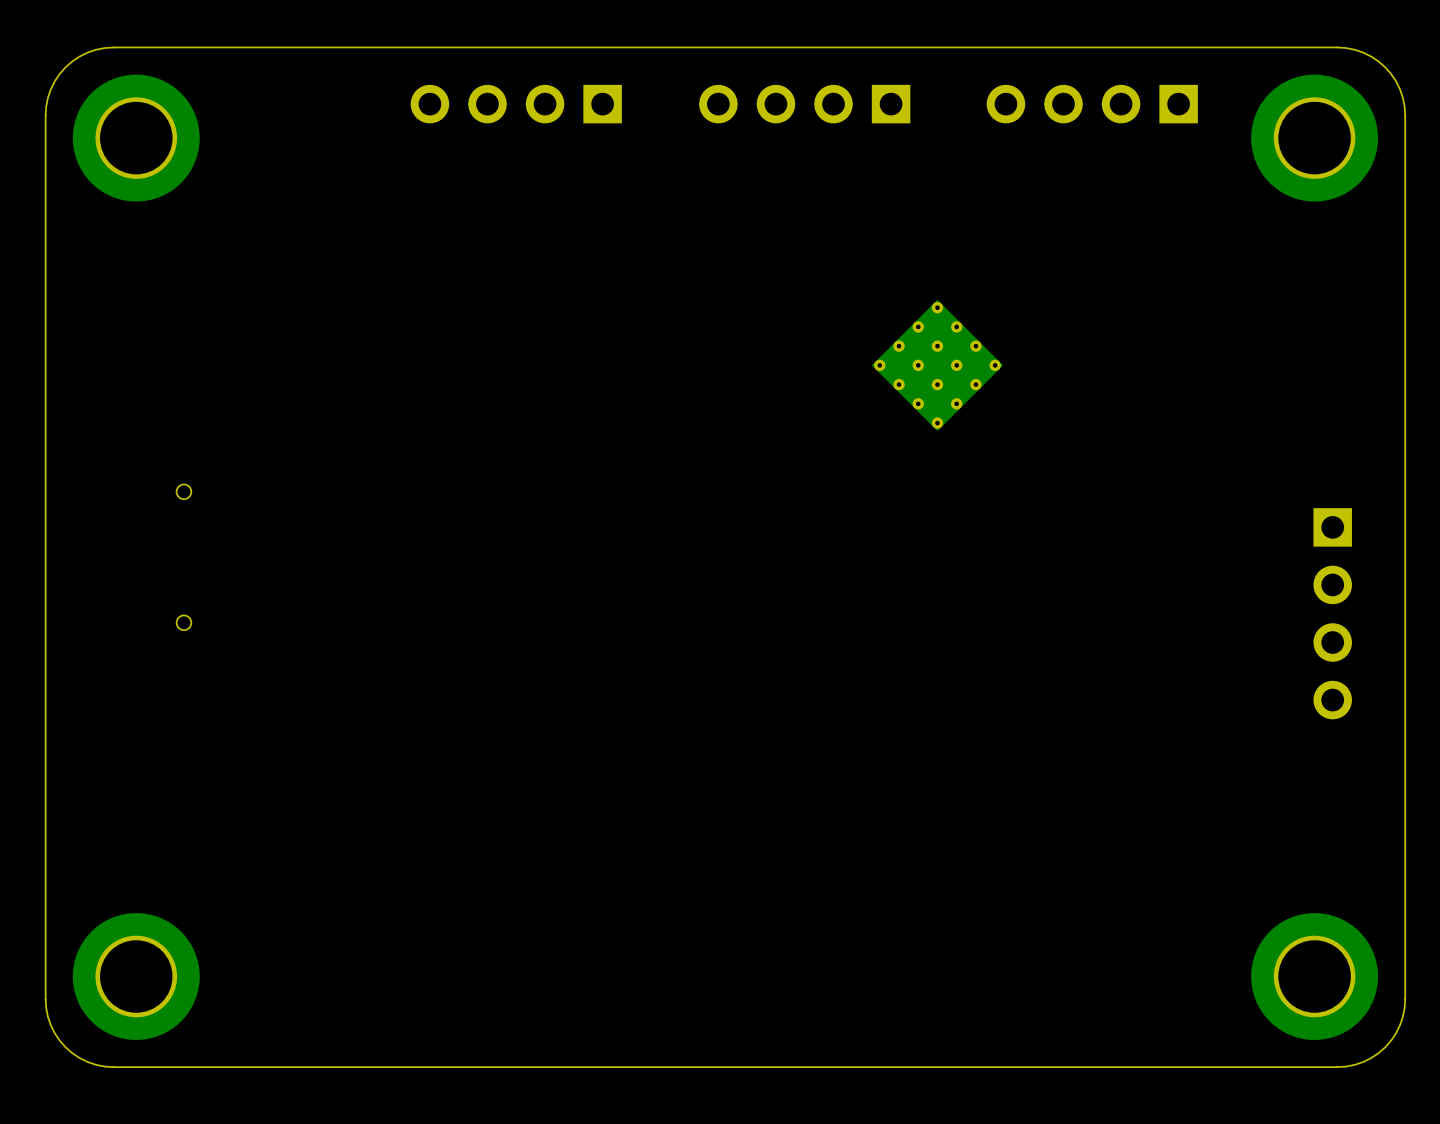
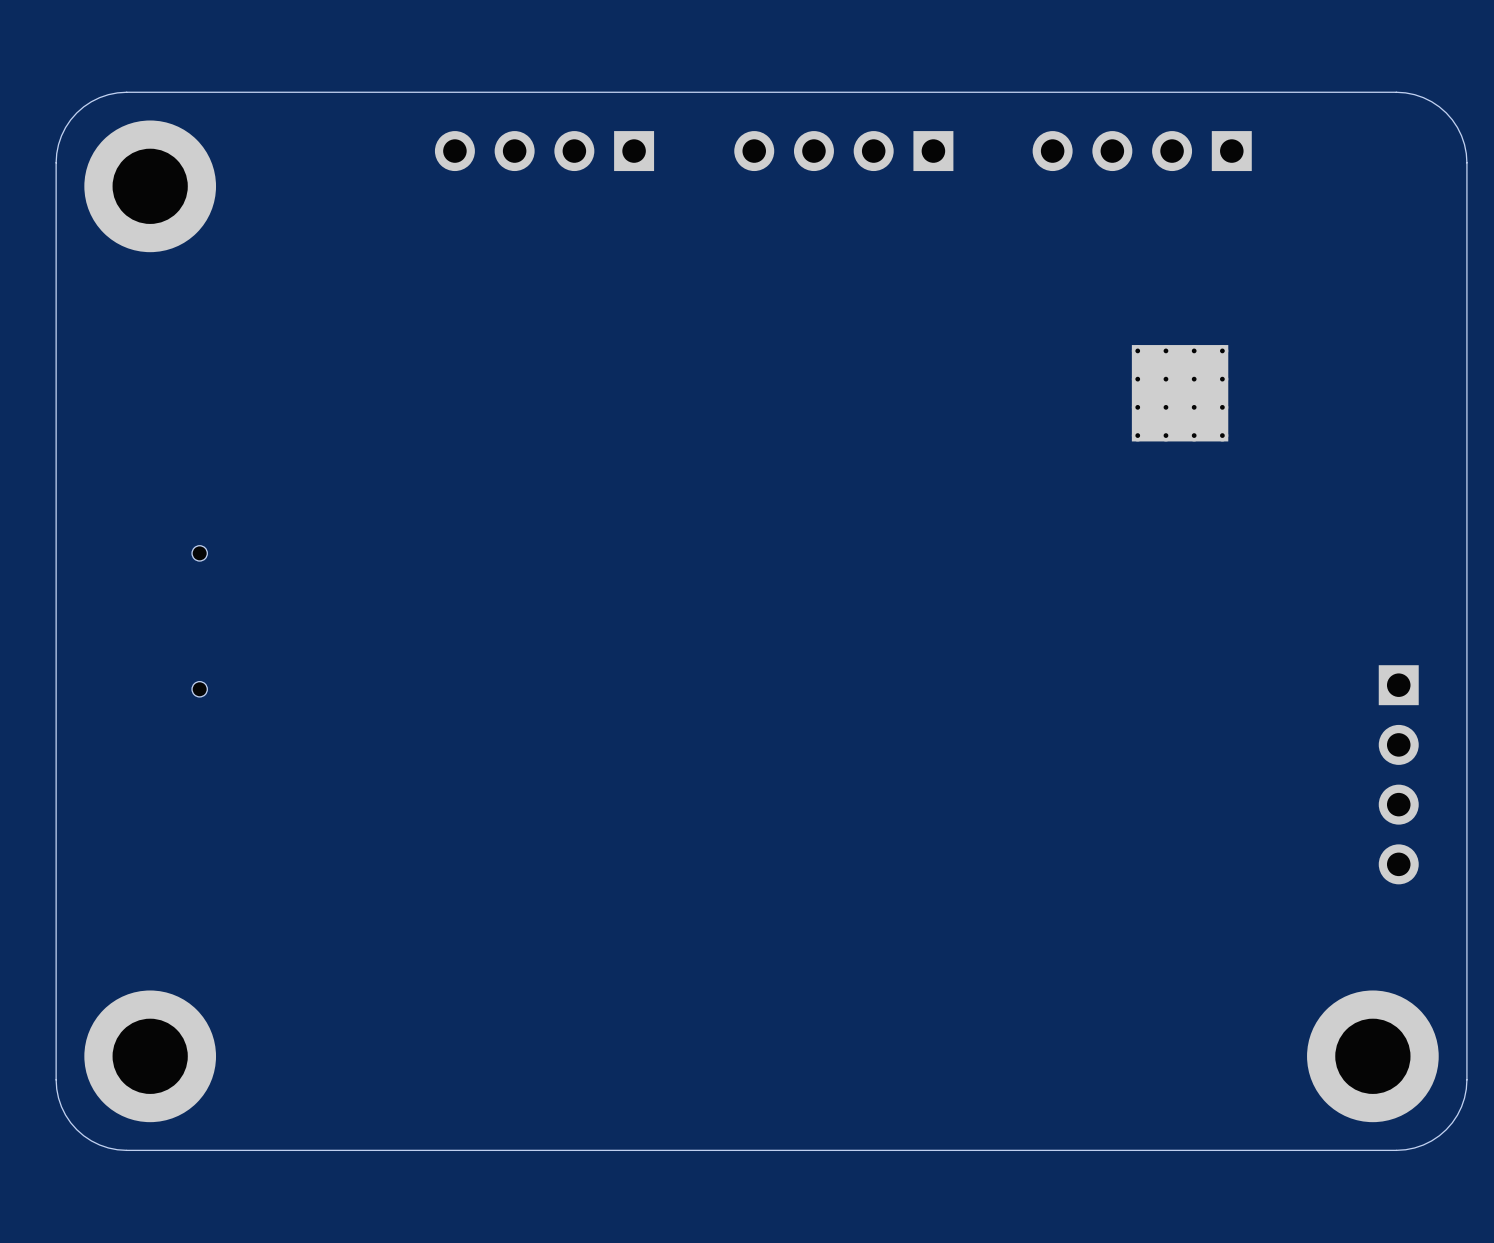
part: (1314, 138) -> none
part: none -> (1180, 393)
part: (937, 365) -> none
part position: (1332, 613) -> (1398, 774)

